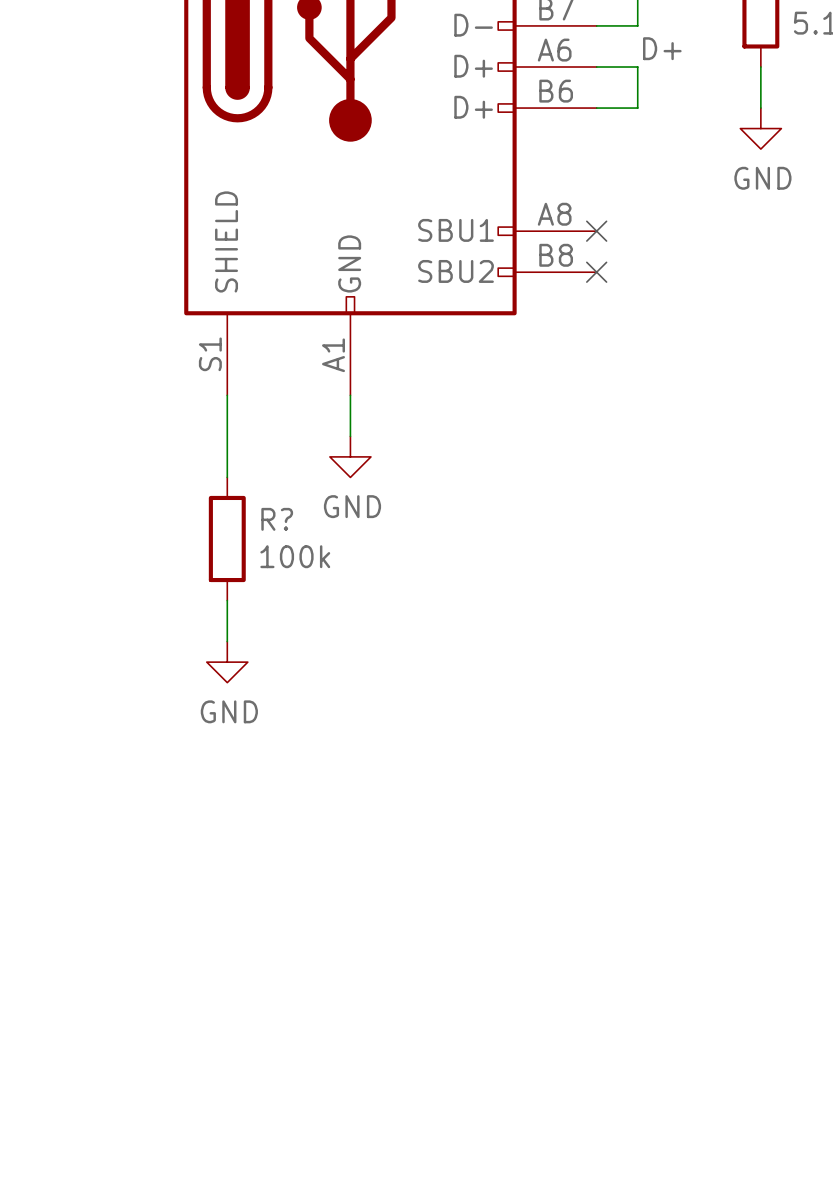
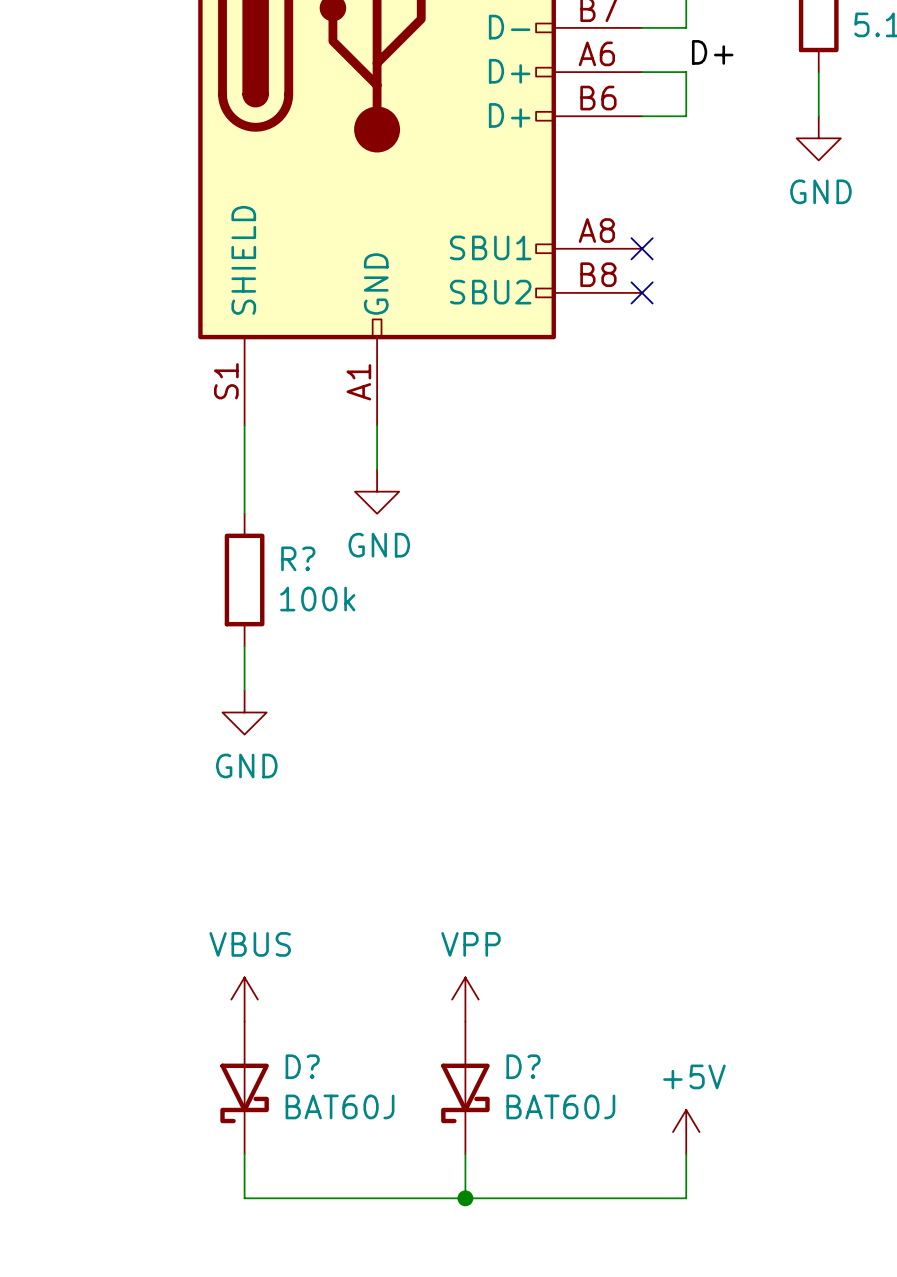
power symbol: none -> VBUS (244, 999)
power symbol: none -> VPP (465, 999)
D?: none -> BAT60J (244, 1087)
D?: none -> BAT60J (465, 1087)
power symbol: none -> +5V (686, 1132)
wire: none -> (244, 1154) (244, 1198) (686, 1198) (686, 1154)
wire: none -> (465, 1154) (465, 1198)
junction: none -> (465, 1198)

